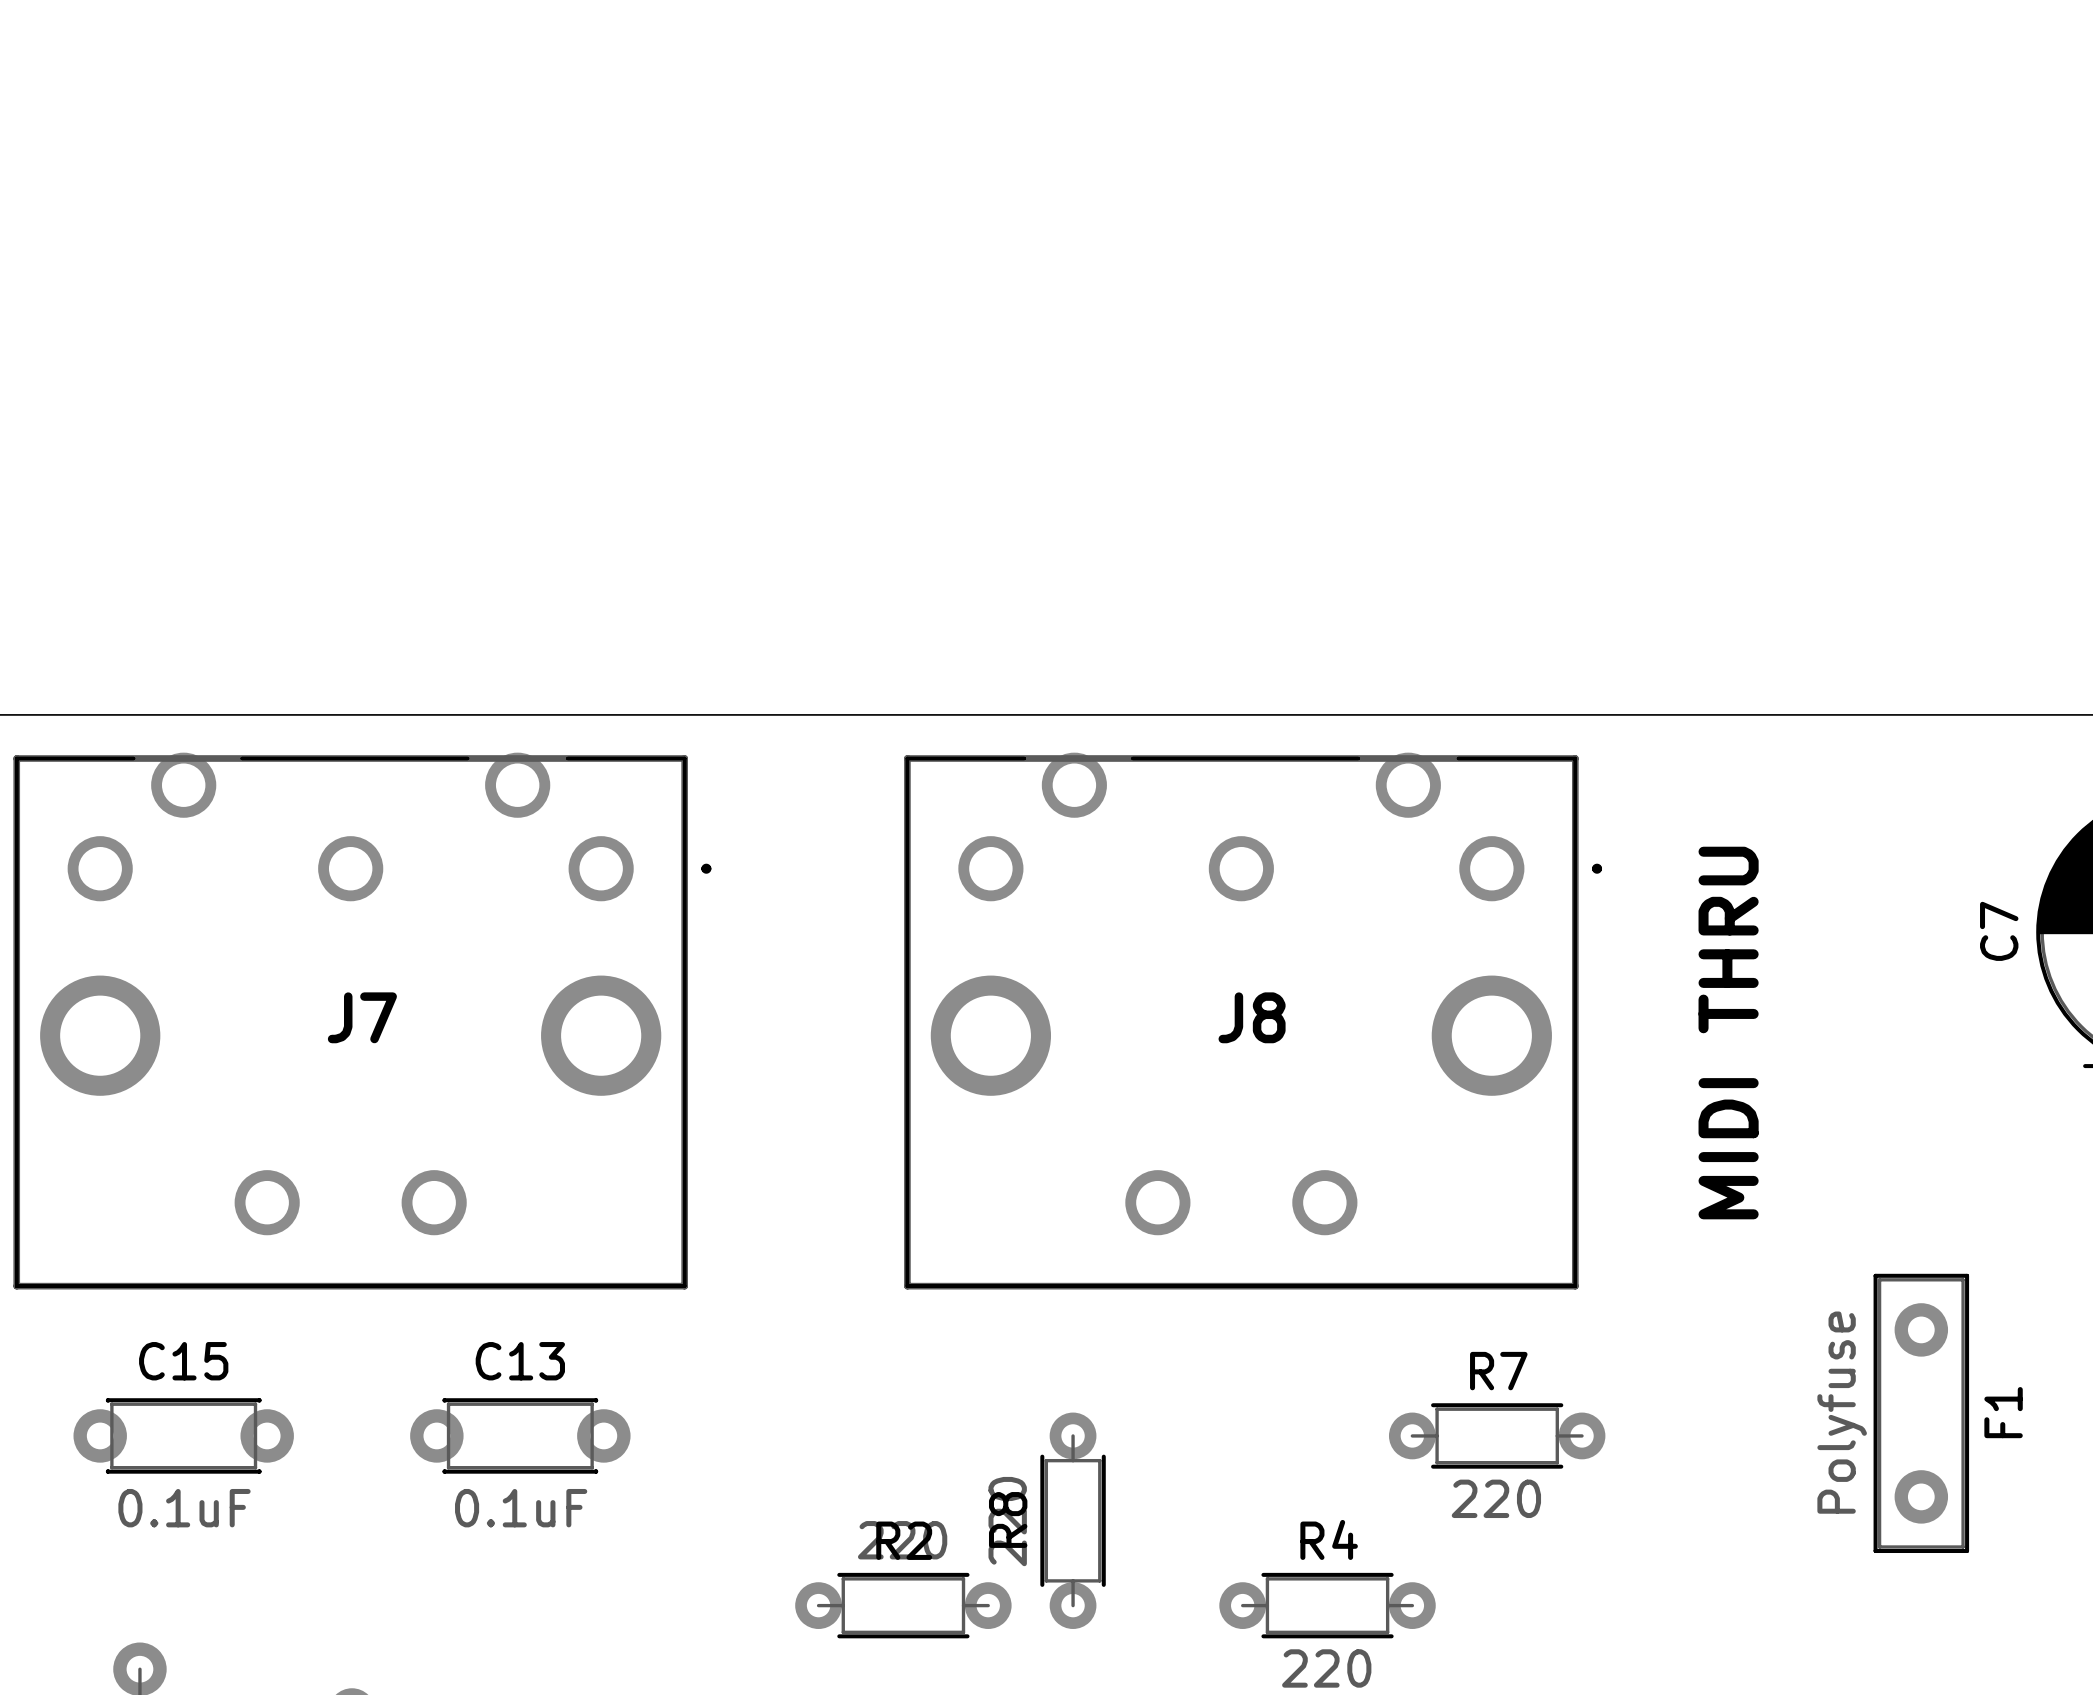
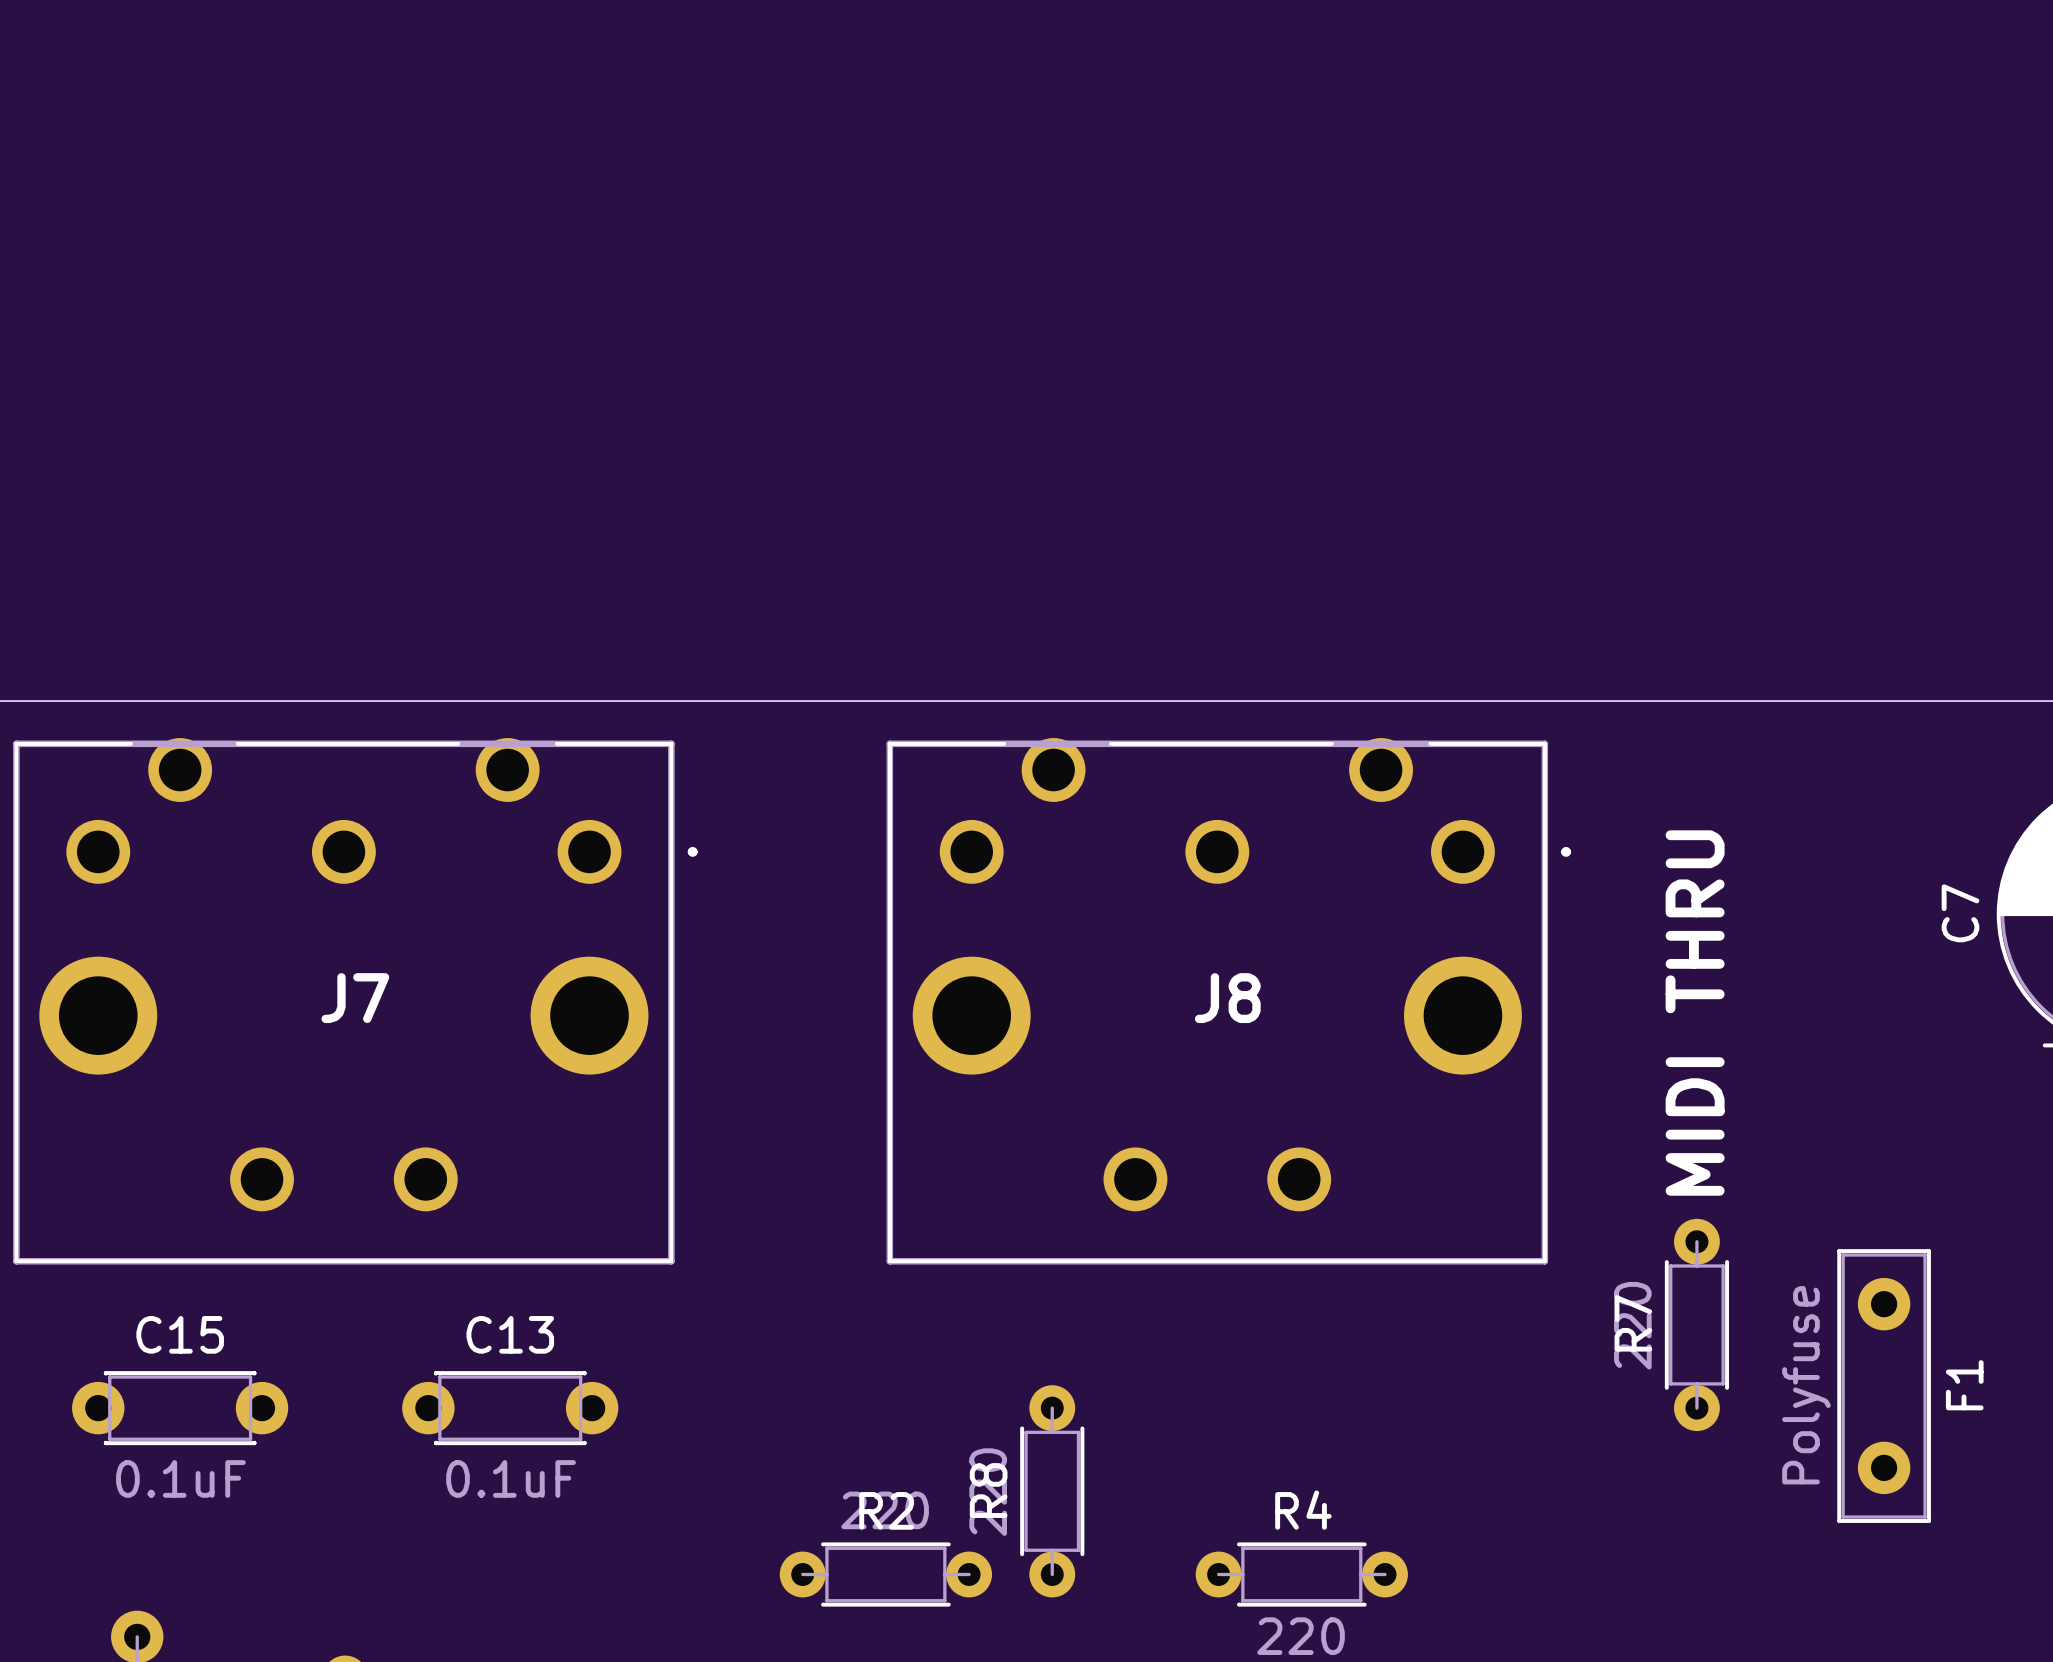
R7 name position: R7 (1498, 1371) -> R7 (1633, 1323)
R7 rotation: 0° (1497, 1435) -> 90° clockwise (1696, 1324)
R7 position: (1497, 1435) -> (1696, 1324)

